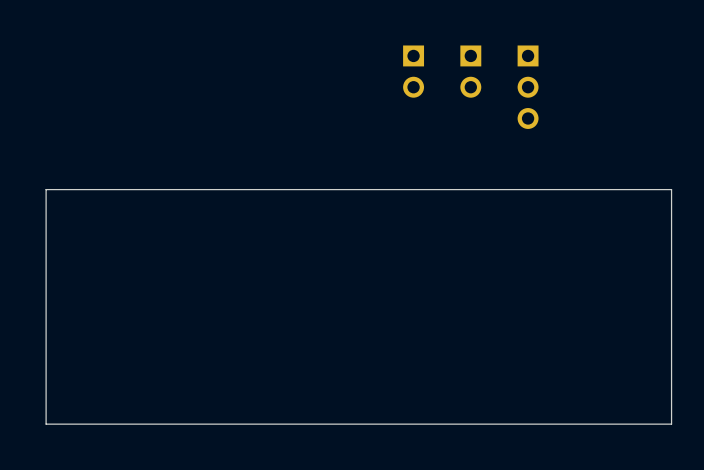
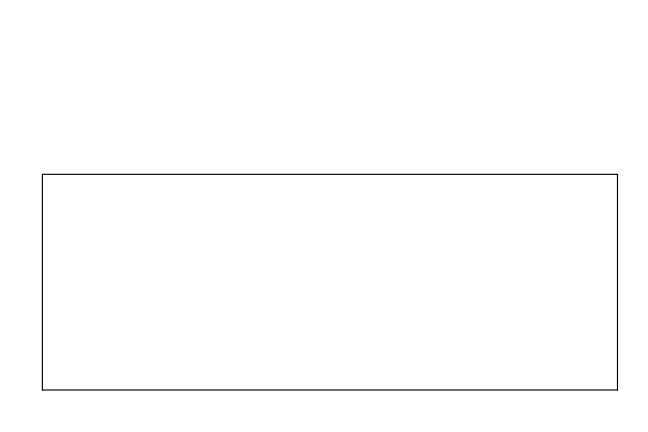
part: (413, 71) -> none
part: (470, 71) -> none
part: (528, 87) -> none

